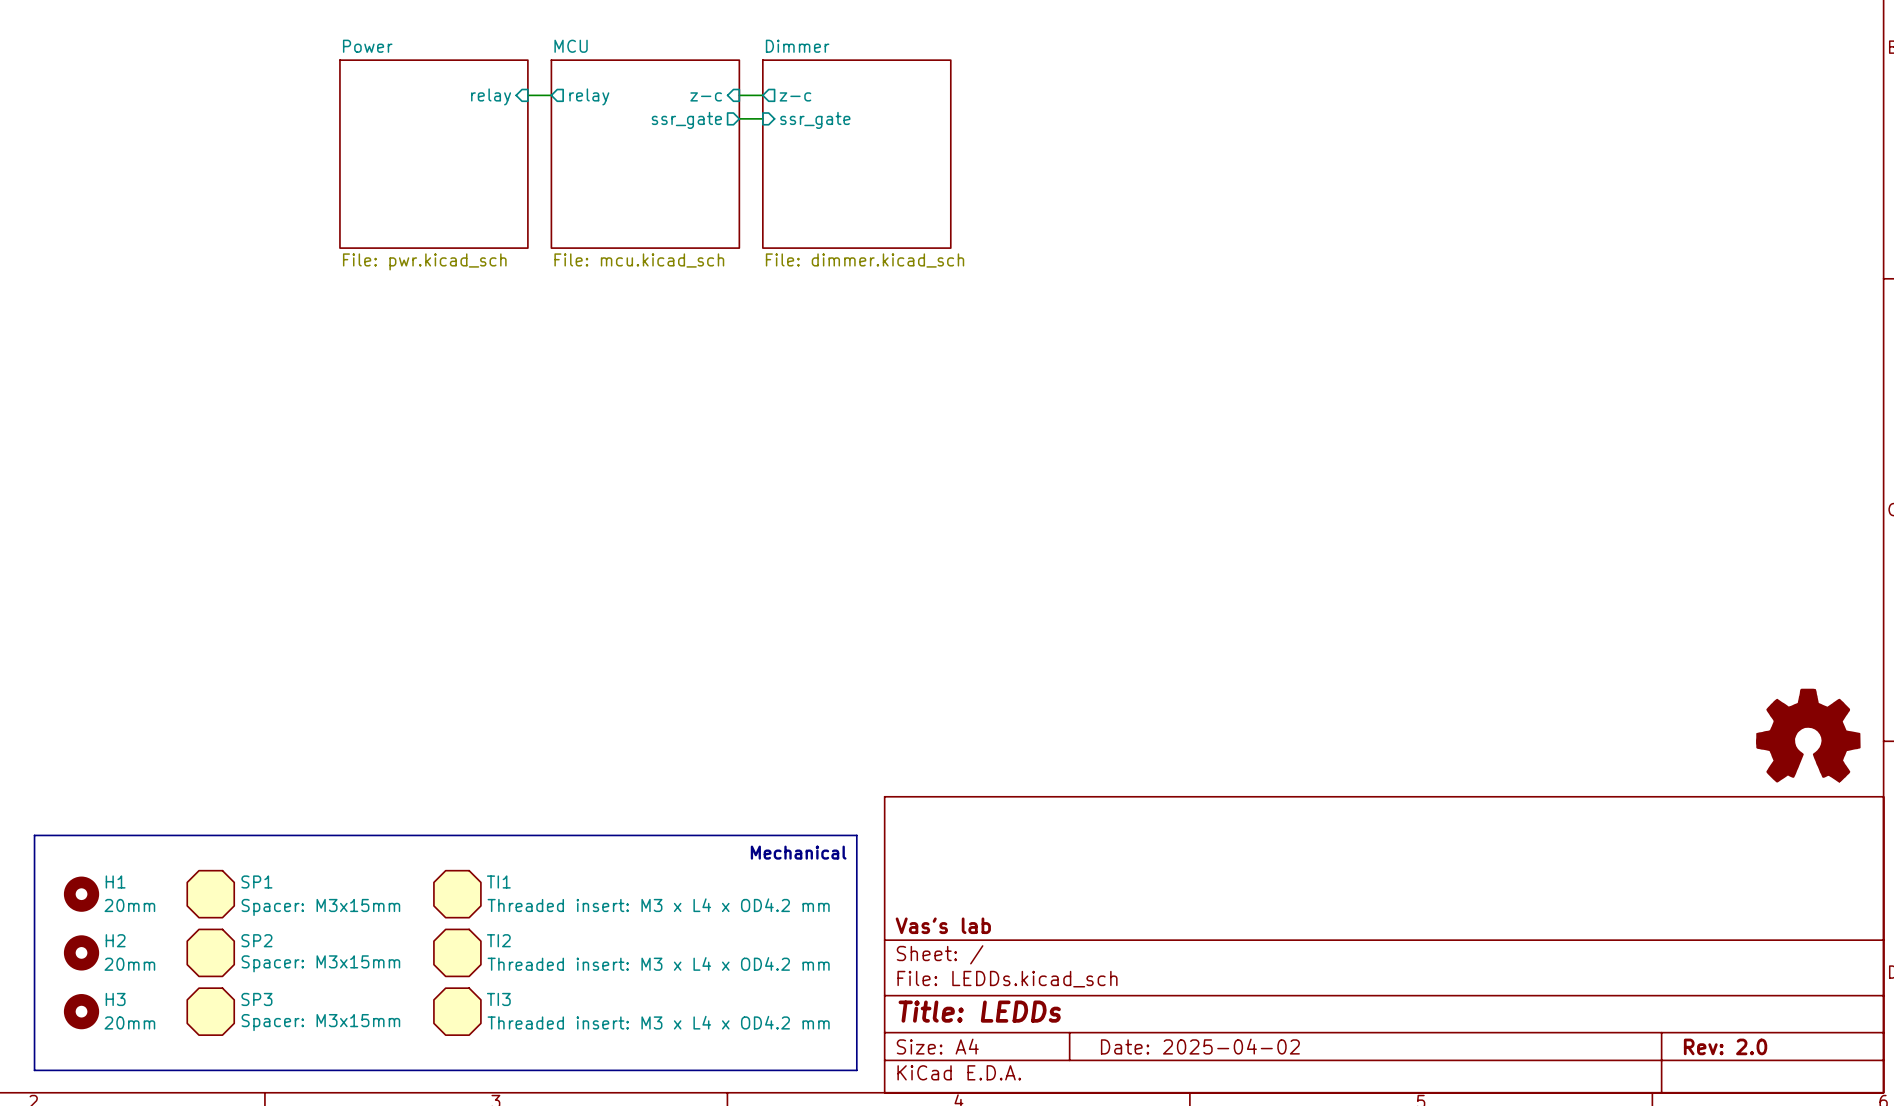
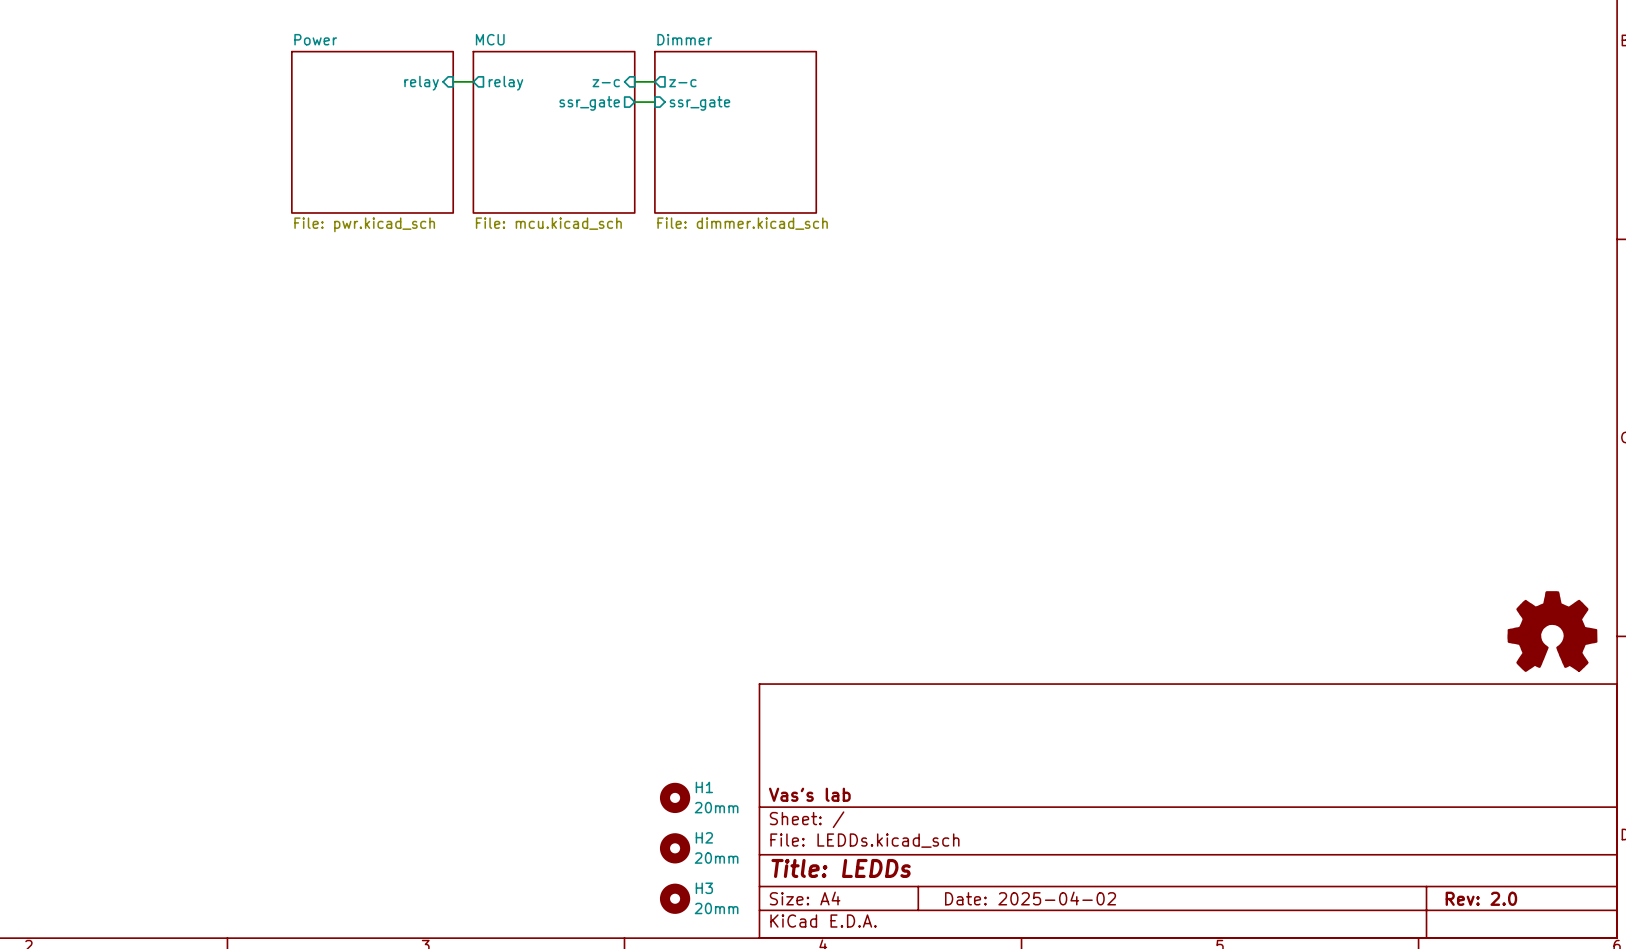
line: (34, 835) (856, 835) (856, 1070) (34, 1070) (34, 835) -> none
text: Mechanical (798, 852) -> none
H1 position: (81, 894) -> (675, 797)
SP1: (210, 894) -> none
TI1: (457, 894) -> none
H2 position: (81, 952) -> (675, 848)
SP2: (210, 952) -> none
TI2: (457, 952) -> none
H3 position: (81, 1011) -> (675, 898)
SP3: (210, 1011) -> none
TI3: (457, 1011) -> none

